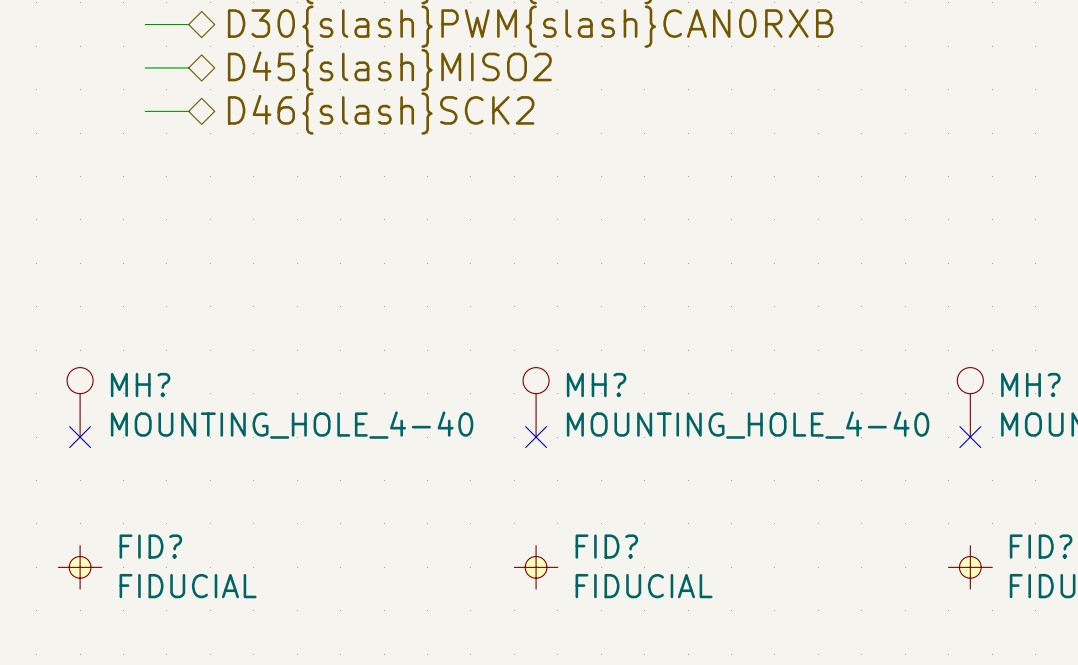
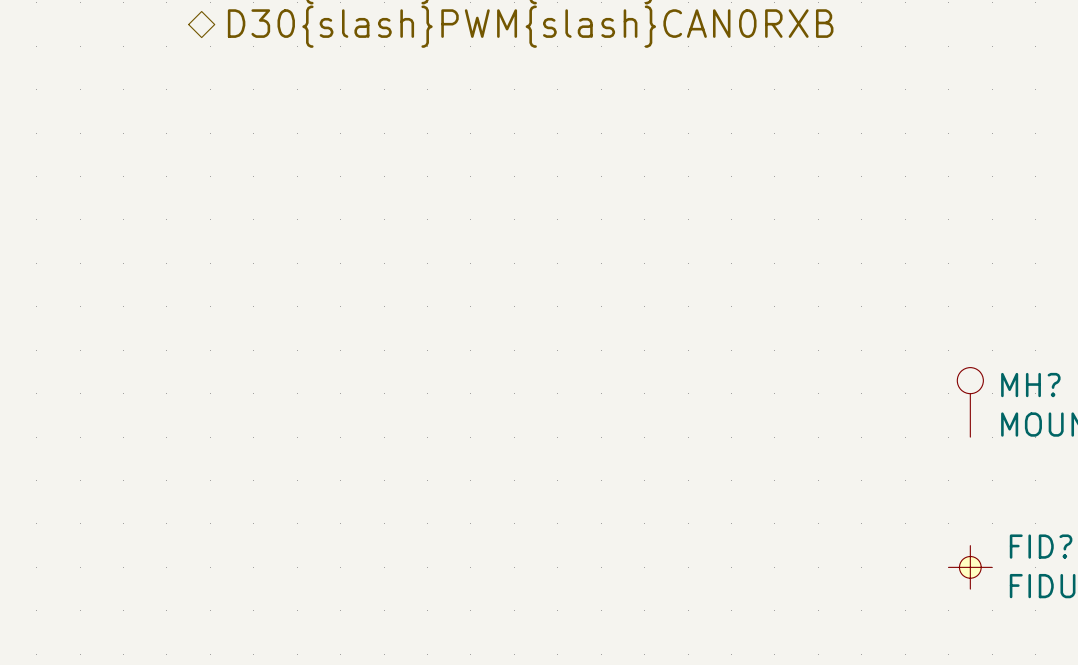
wire: (145, 24) (188, 24) -> none
wire: (145, 67) (188, 67) -> none
hierarchical label: D45{slash}MISO2 (389, 70) -> none
wire: (145, 111) (188, 111) -> none
hierarchical label: D46{slash}SCK2 (381, 113) -> none
MH?: MOUNTING_HOLE_4-40 (80, 402) -> none
MH?: MOUNTING_HOLE_4-40 (536, 402) -> none
no-connect mark: (80, 437) -> none
no-connect mark: (536, 437) -> none
no-connect mark: (970, 437) -> none
FID?: FIDUCIAL (80, 567) -> none
FID?: FIDUCIAL (536, 567) -> none

